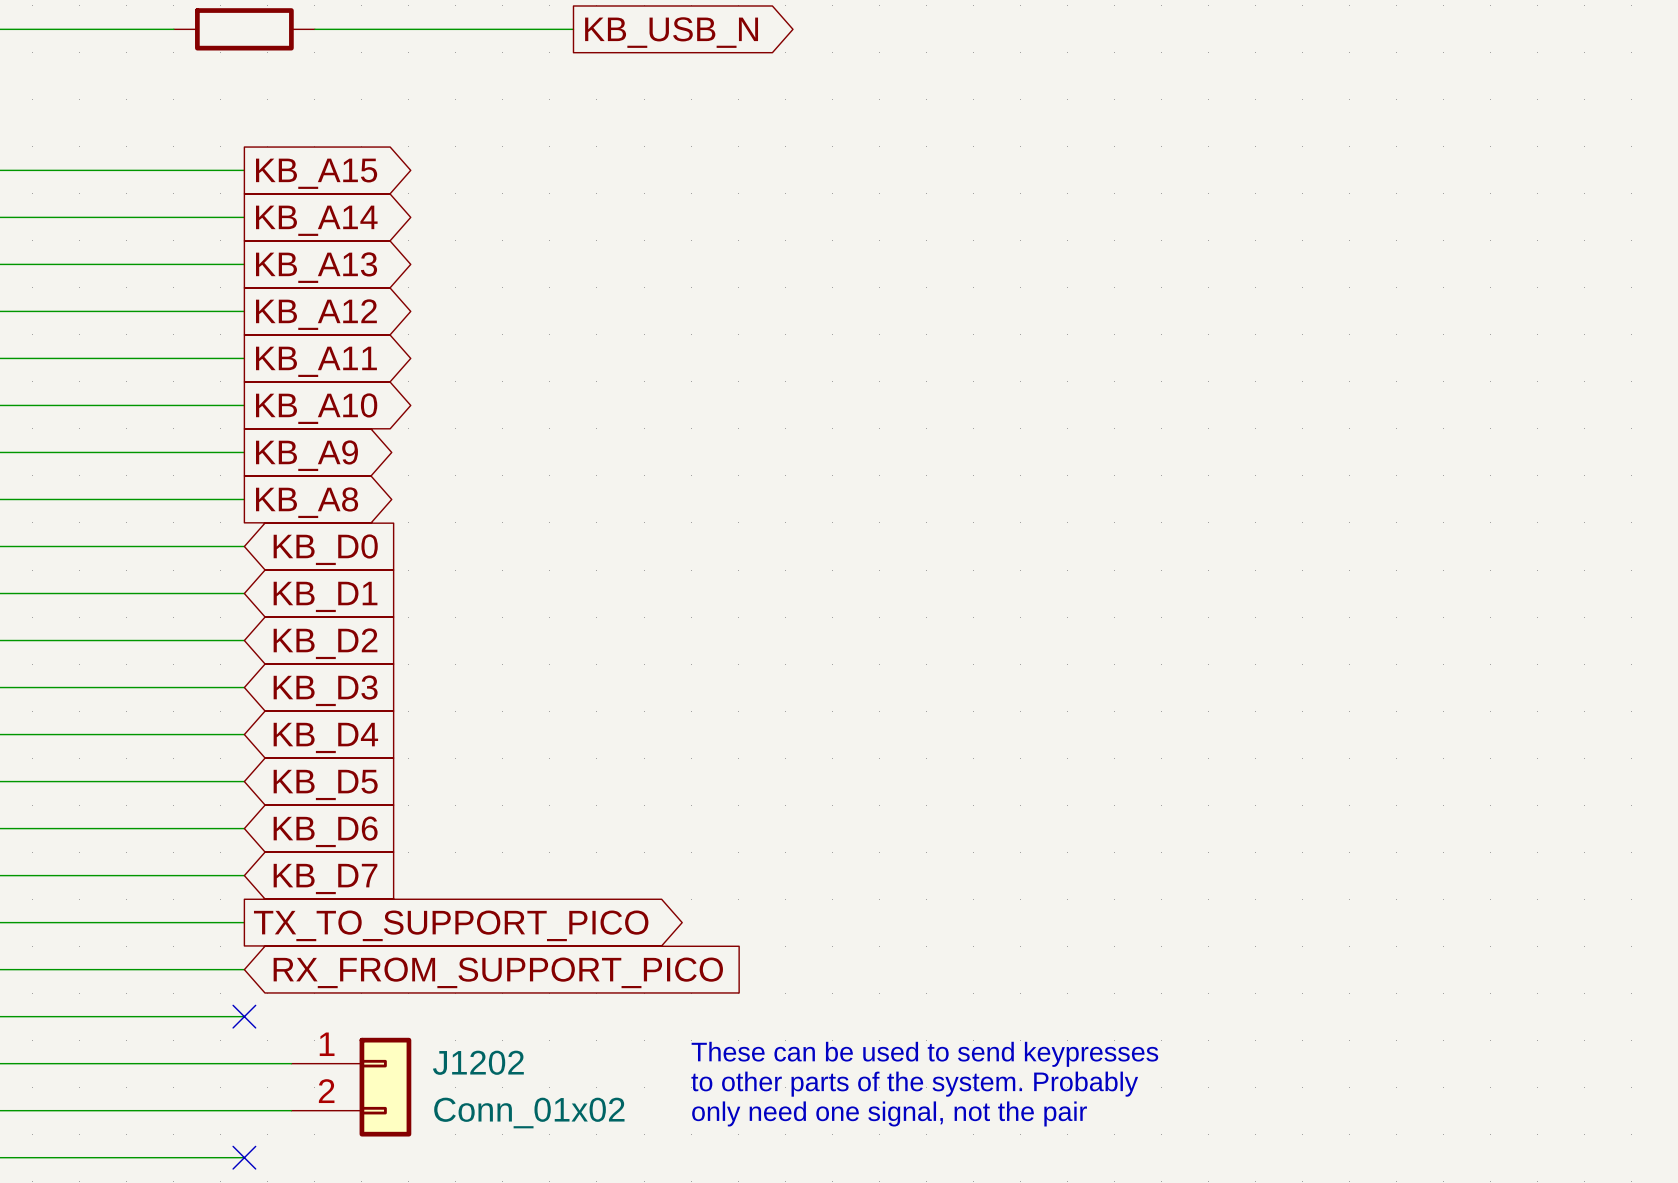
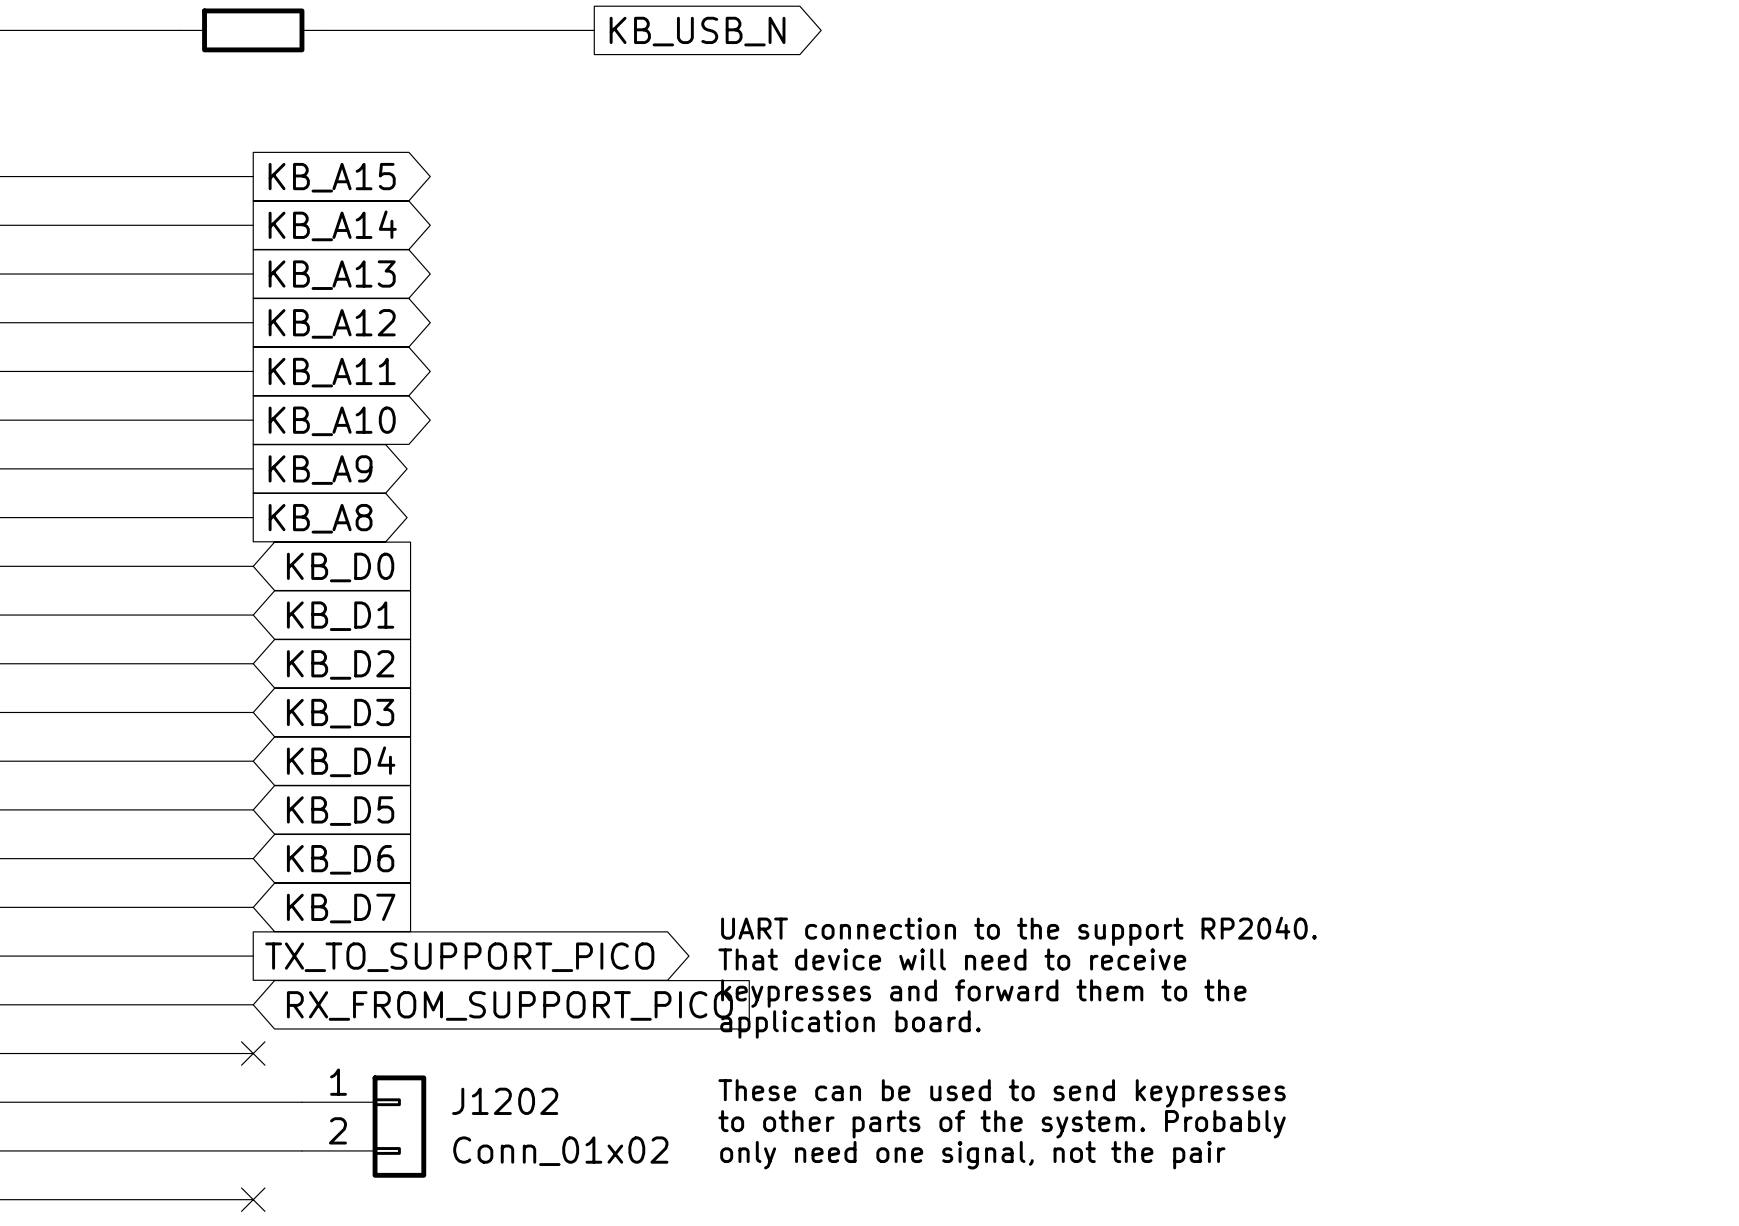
text: none -> UART connection to the support RP2040. (1018, 931)
text: none -> That device will need to receive (952, 959)
text: none -> keypresses and forward them to the (983, 993)
text: none -> application board. (850, 1024)

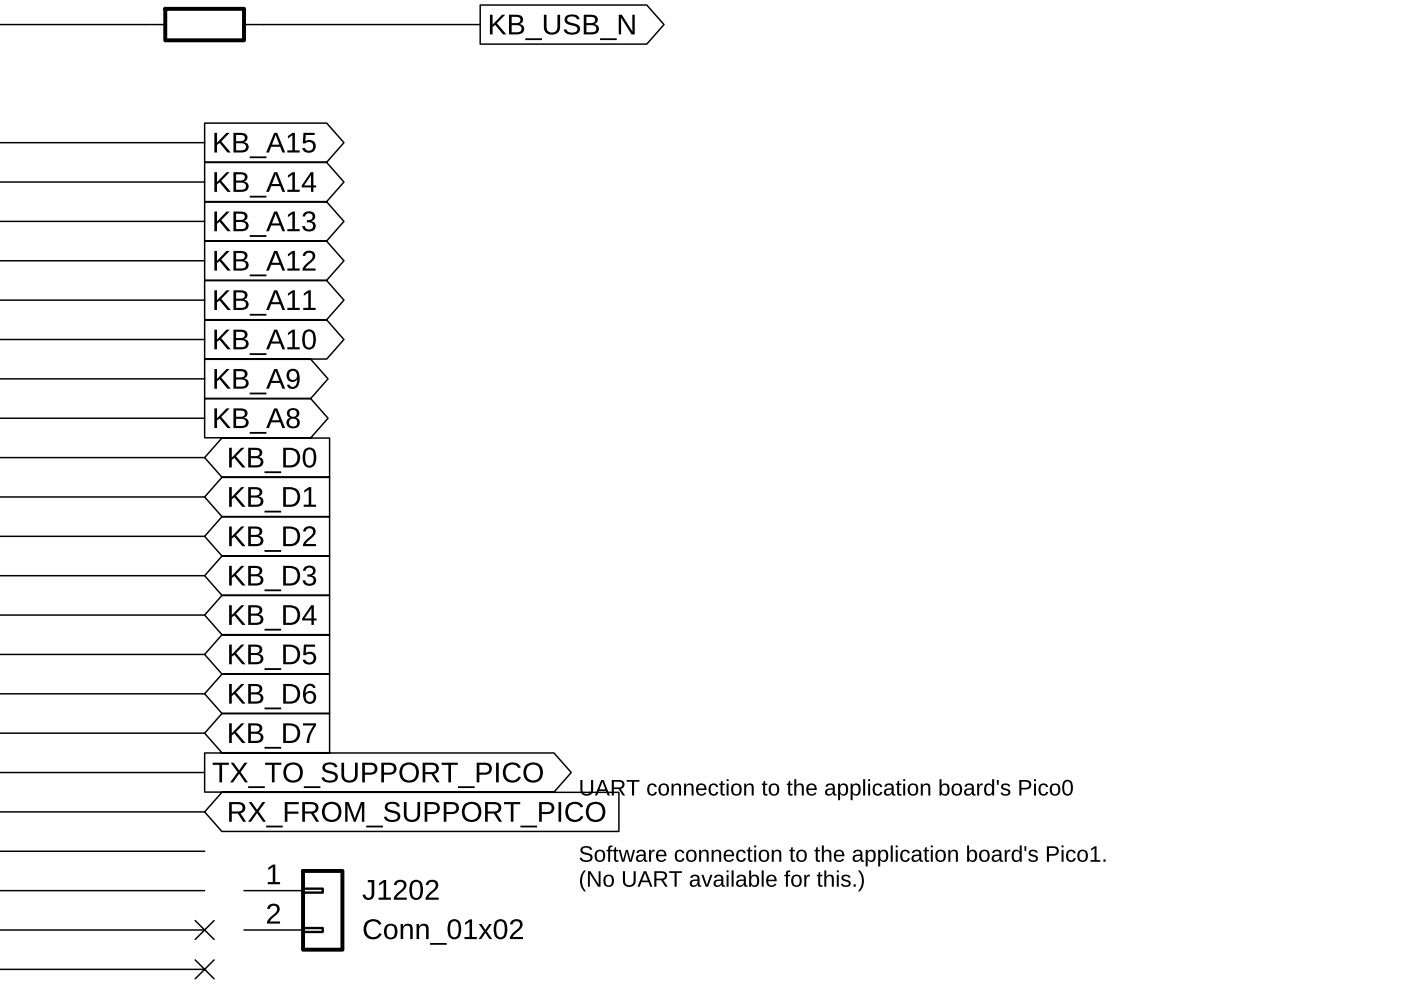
text: UART connection to the support RP2040. (1018, 931) -> none
text: That device will need to receive (952, 959) -> none
text: none -> UART connection to the application board's Pico0 (826, 789)
text: keypresses and forward them to the (983, 993) -> none
text: application board. (850, 1024) -> none
no-connect mark position: (253, 1053) -> (204, 930)
text: none -> Software connection to the application board's Pico1. (842, 855)
text: These can be used to send keypresses (1002, 1093) -> (No UART available for this.) (721, 880)
wire: (253, 1102) (301, 1102) -> none
text: to other parts of the system. Probably (1002, 1124) -> none
wire: (253, 1150) (301, 1150) -> none
text: only need one signal, not the pair (972, 1155) -> none

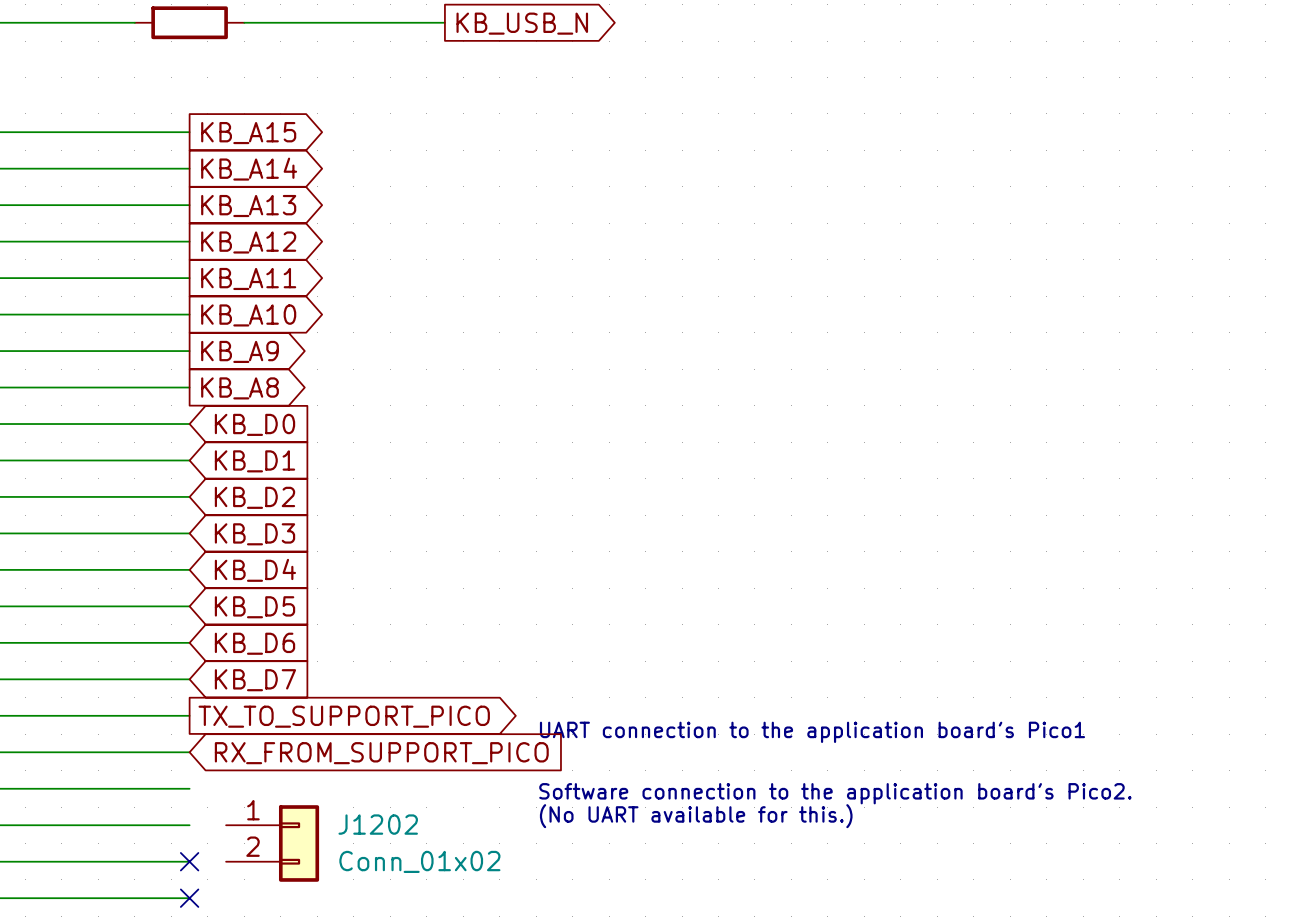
text: UART connection to the application board's Pico0 (826, 789) -> UART connection to the application board's Pico1 (812, 732)
text: Software connection to the application board's Pico1. (842, 855) -> Software connection to the application board's Pico2. (835, 793)

